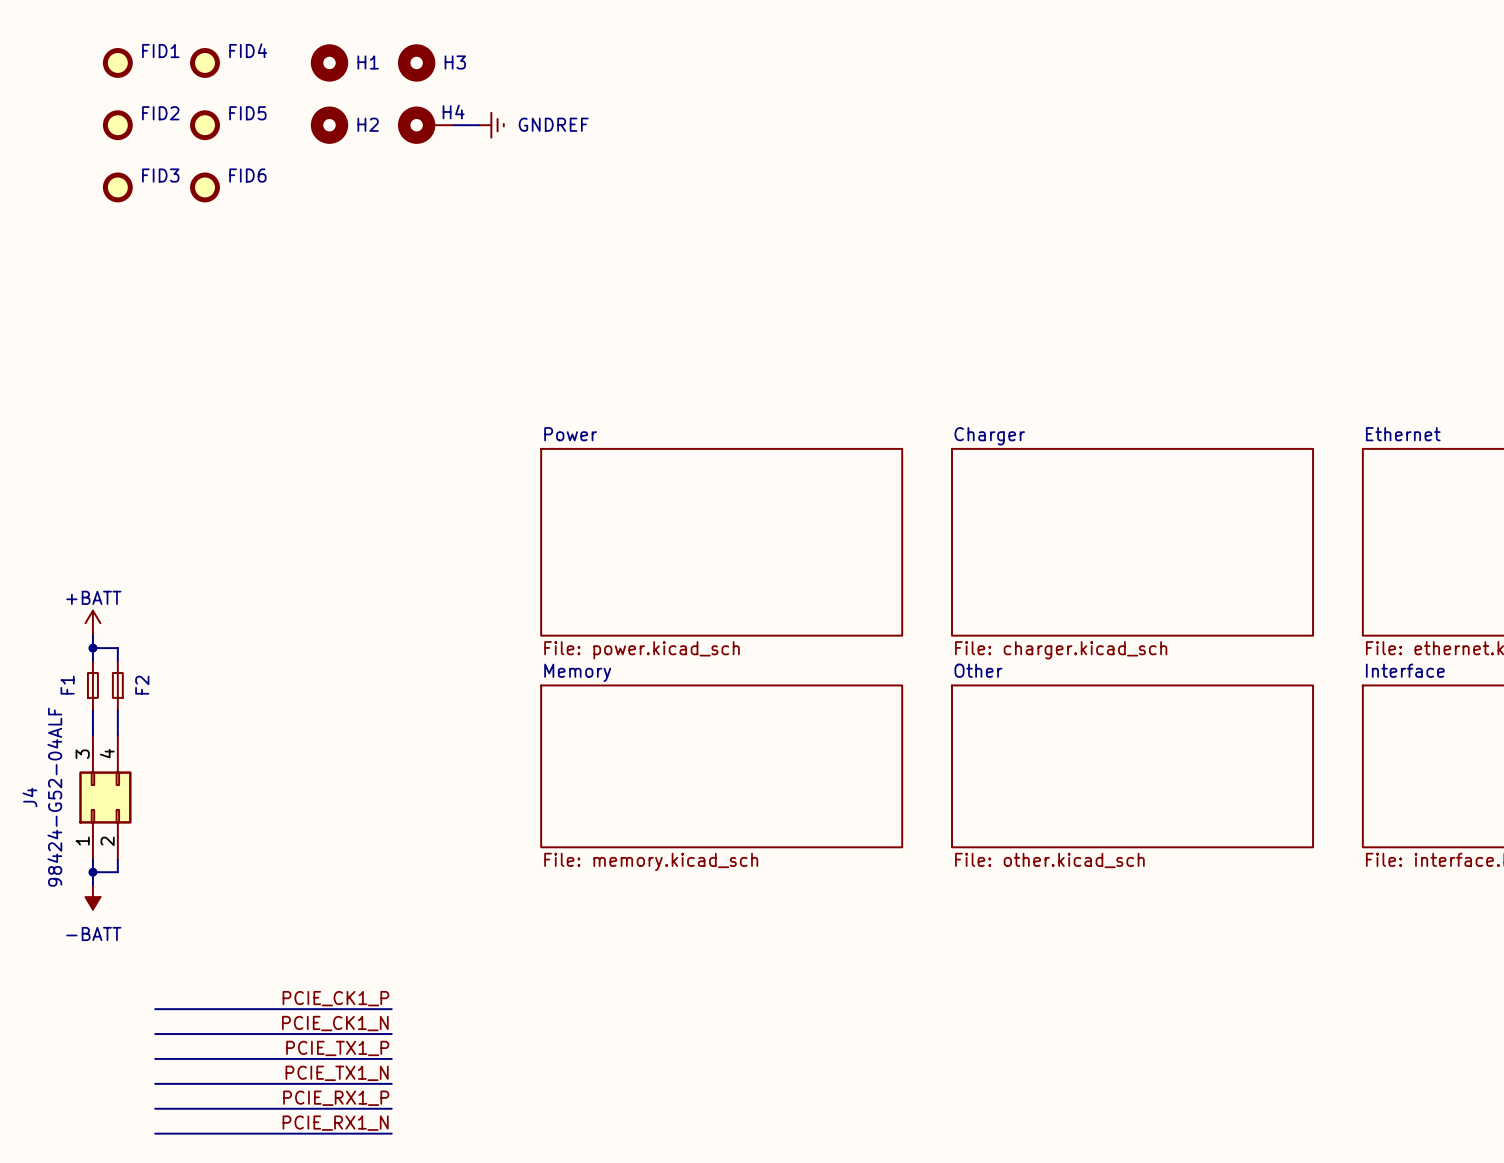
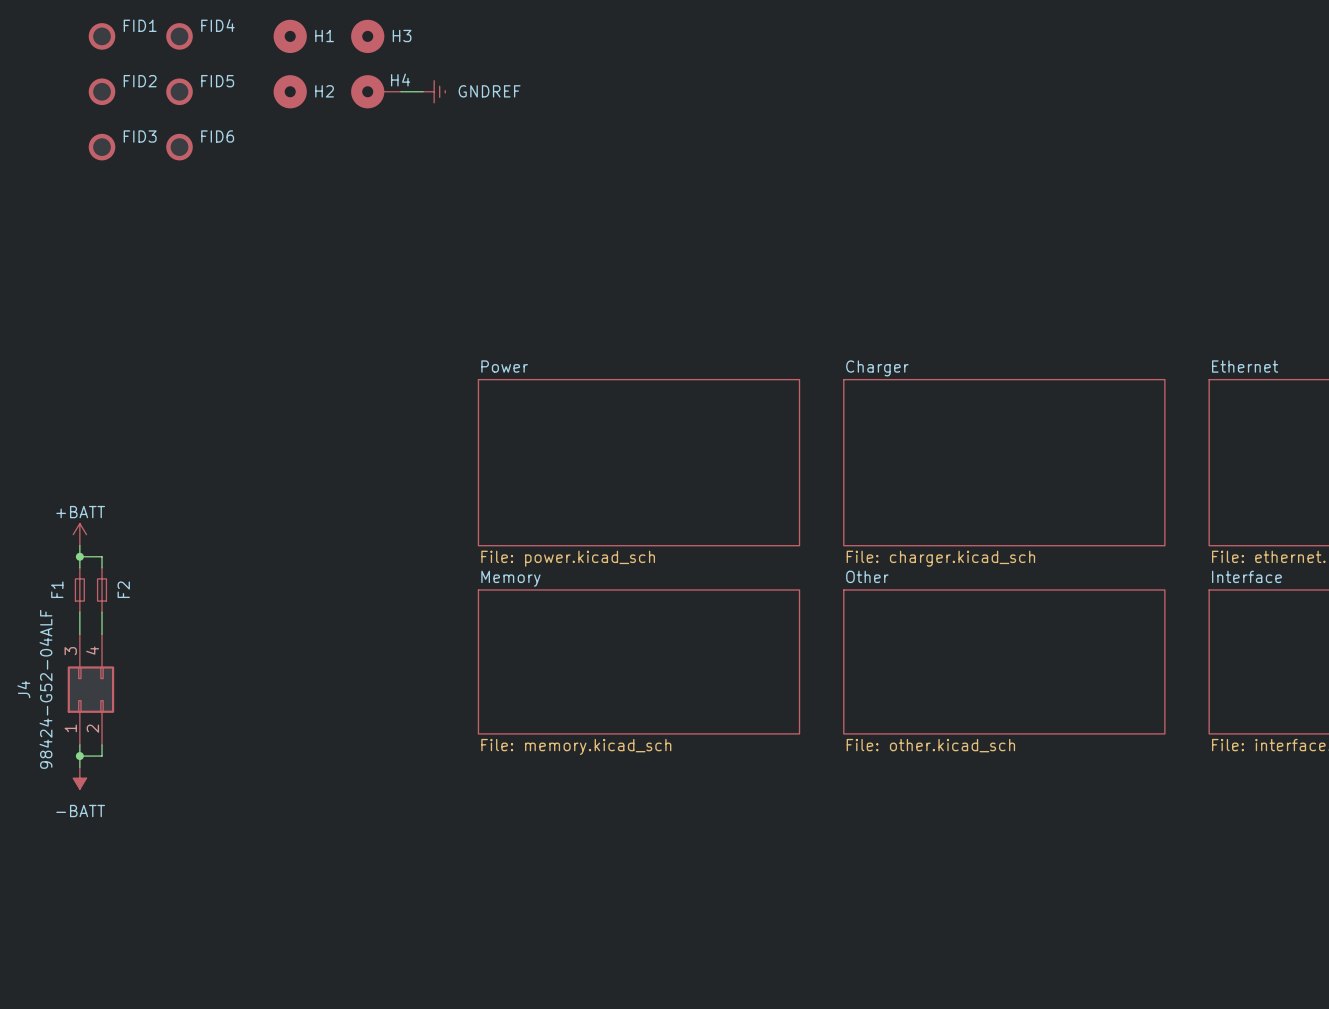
label: PCIE_CK1_P (335, 998) -> none
wire: (155, 1009) (391, 1009) -> none
label: PCIE_CK1_N (335, 1023) -> none
wire: (155, 1034) (391, 1034) -> none
label: PCIE_TX1_P (337, 1048) -> none
wire: (155, 1058) (391, 1058) -> none
label: PCIE_TX1_N (337, 1073) -> none
wire: (155, 1083) (391, 1083) -> none
label: PCIE_RX1_P (336, 1098) -> none
wire: (155, 1108) (391, 1108) -> none
label: PCIE_RX1_N (335, 1123) -> none
wire: (155, 1133) (391, 1133) -> none

